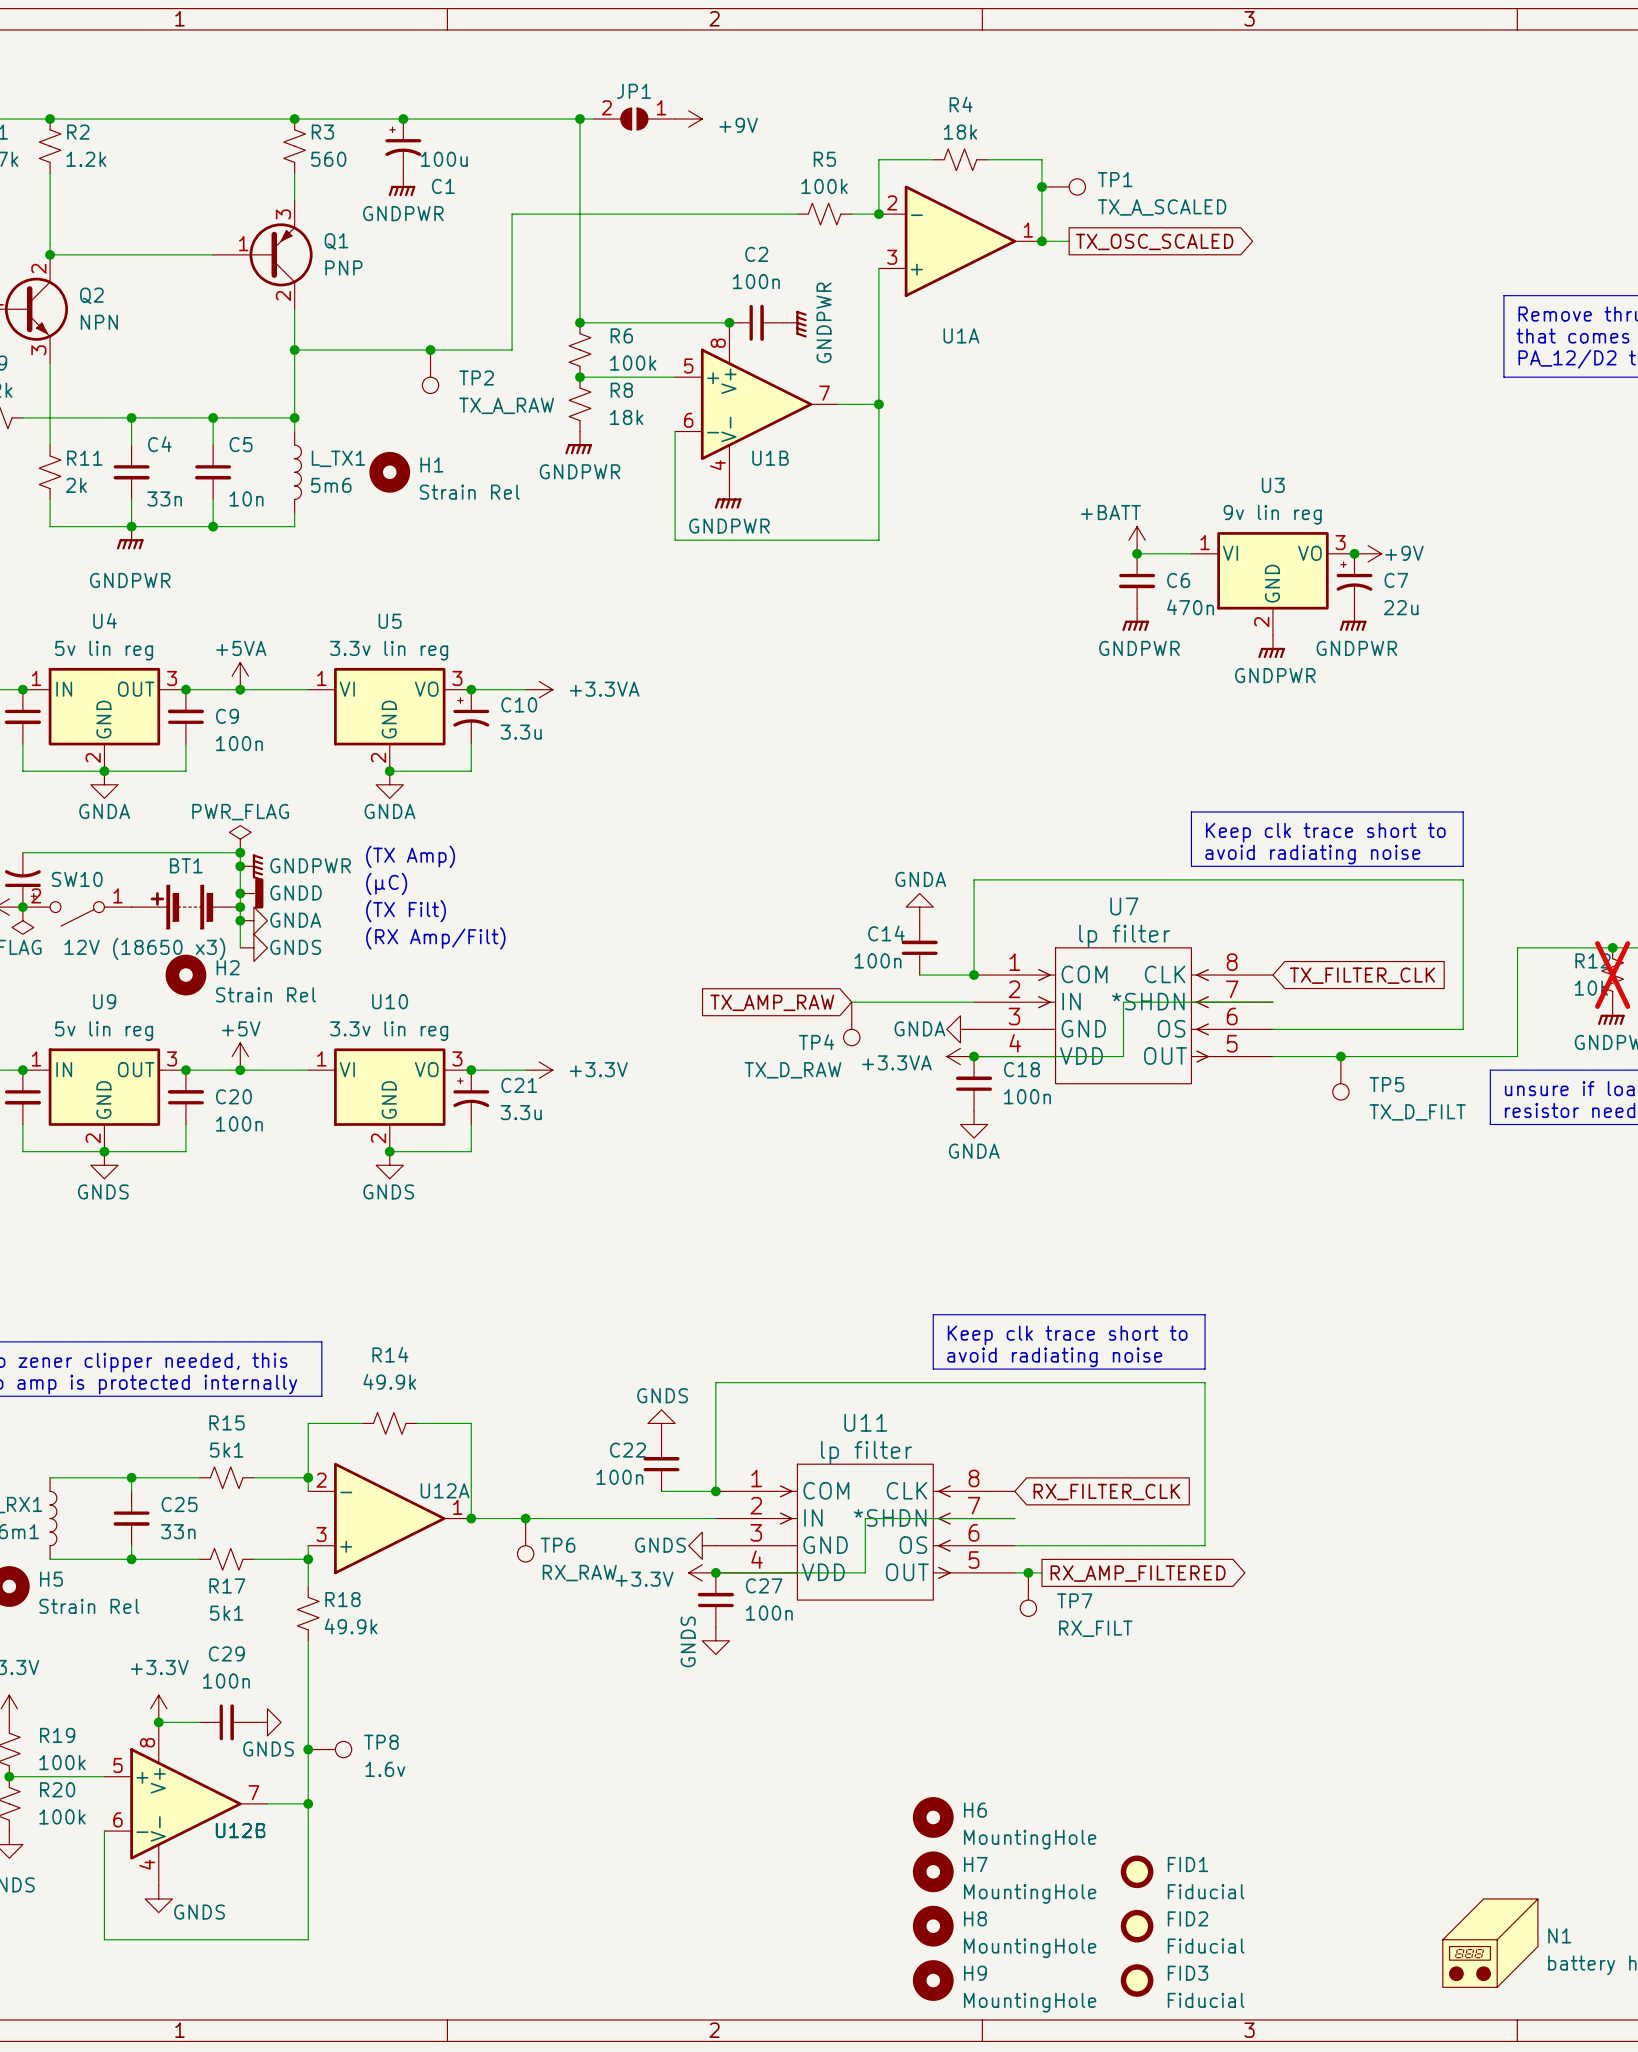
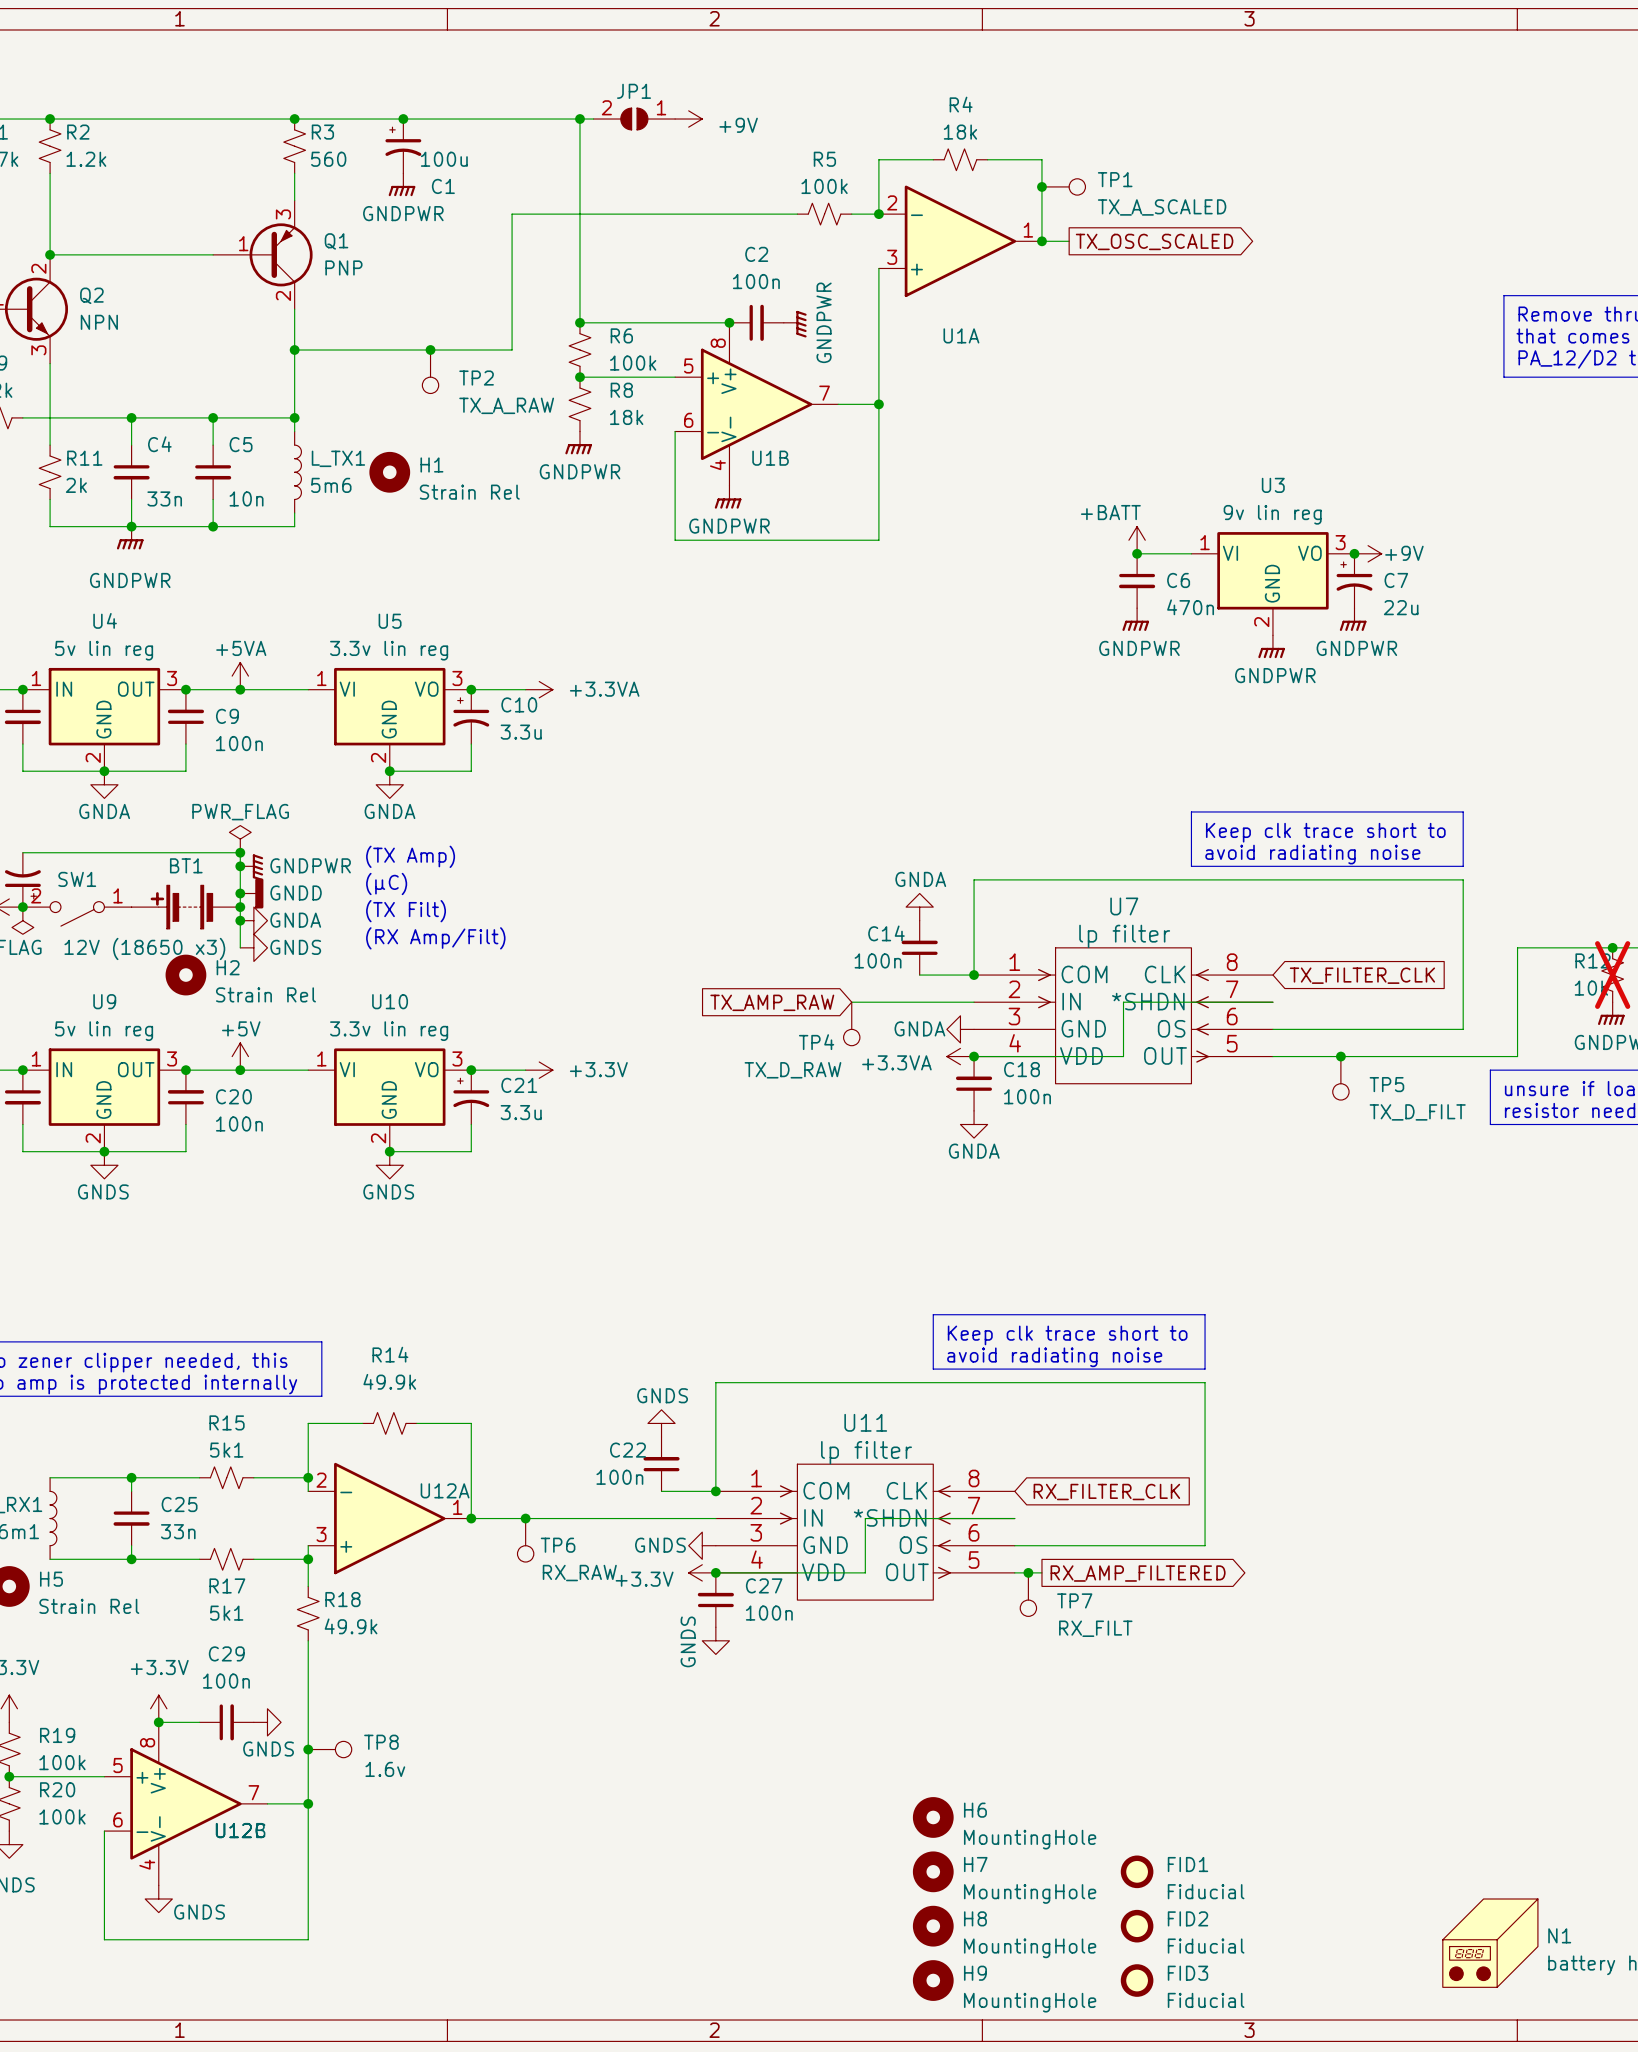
SW10 name: SW10 (77, 879) -> SW1 (77, 879)

